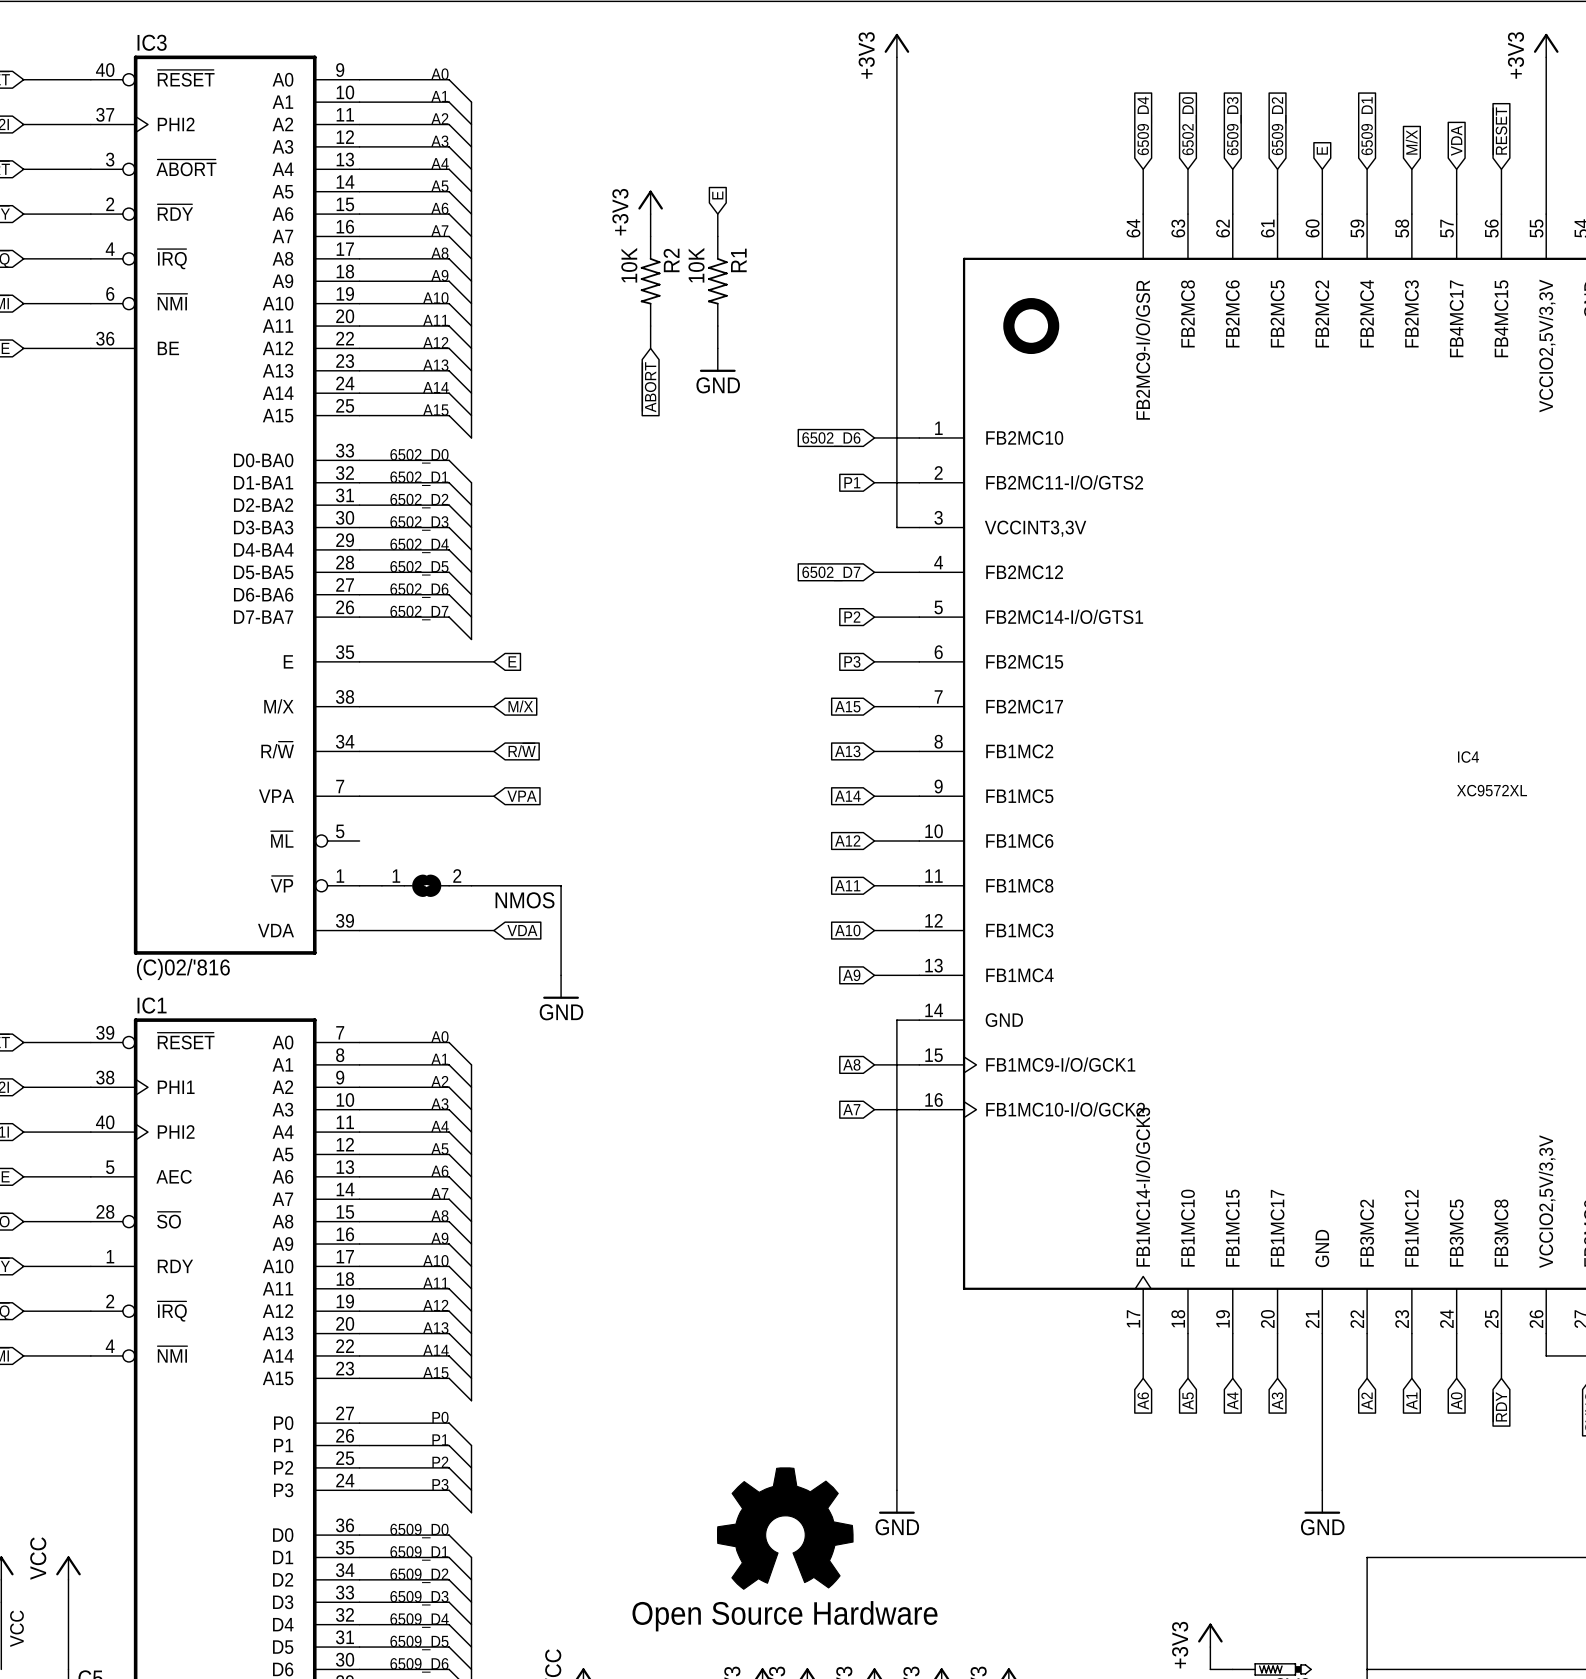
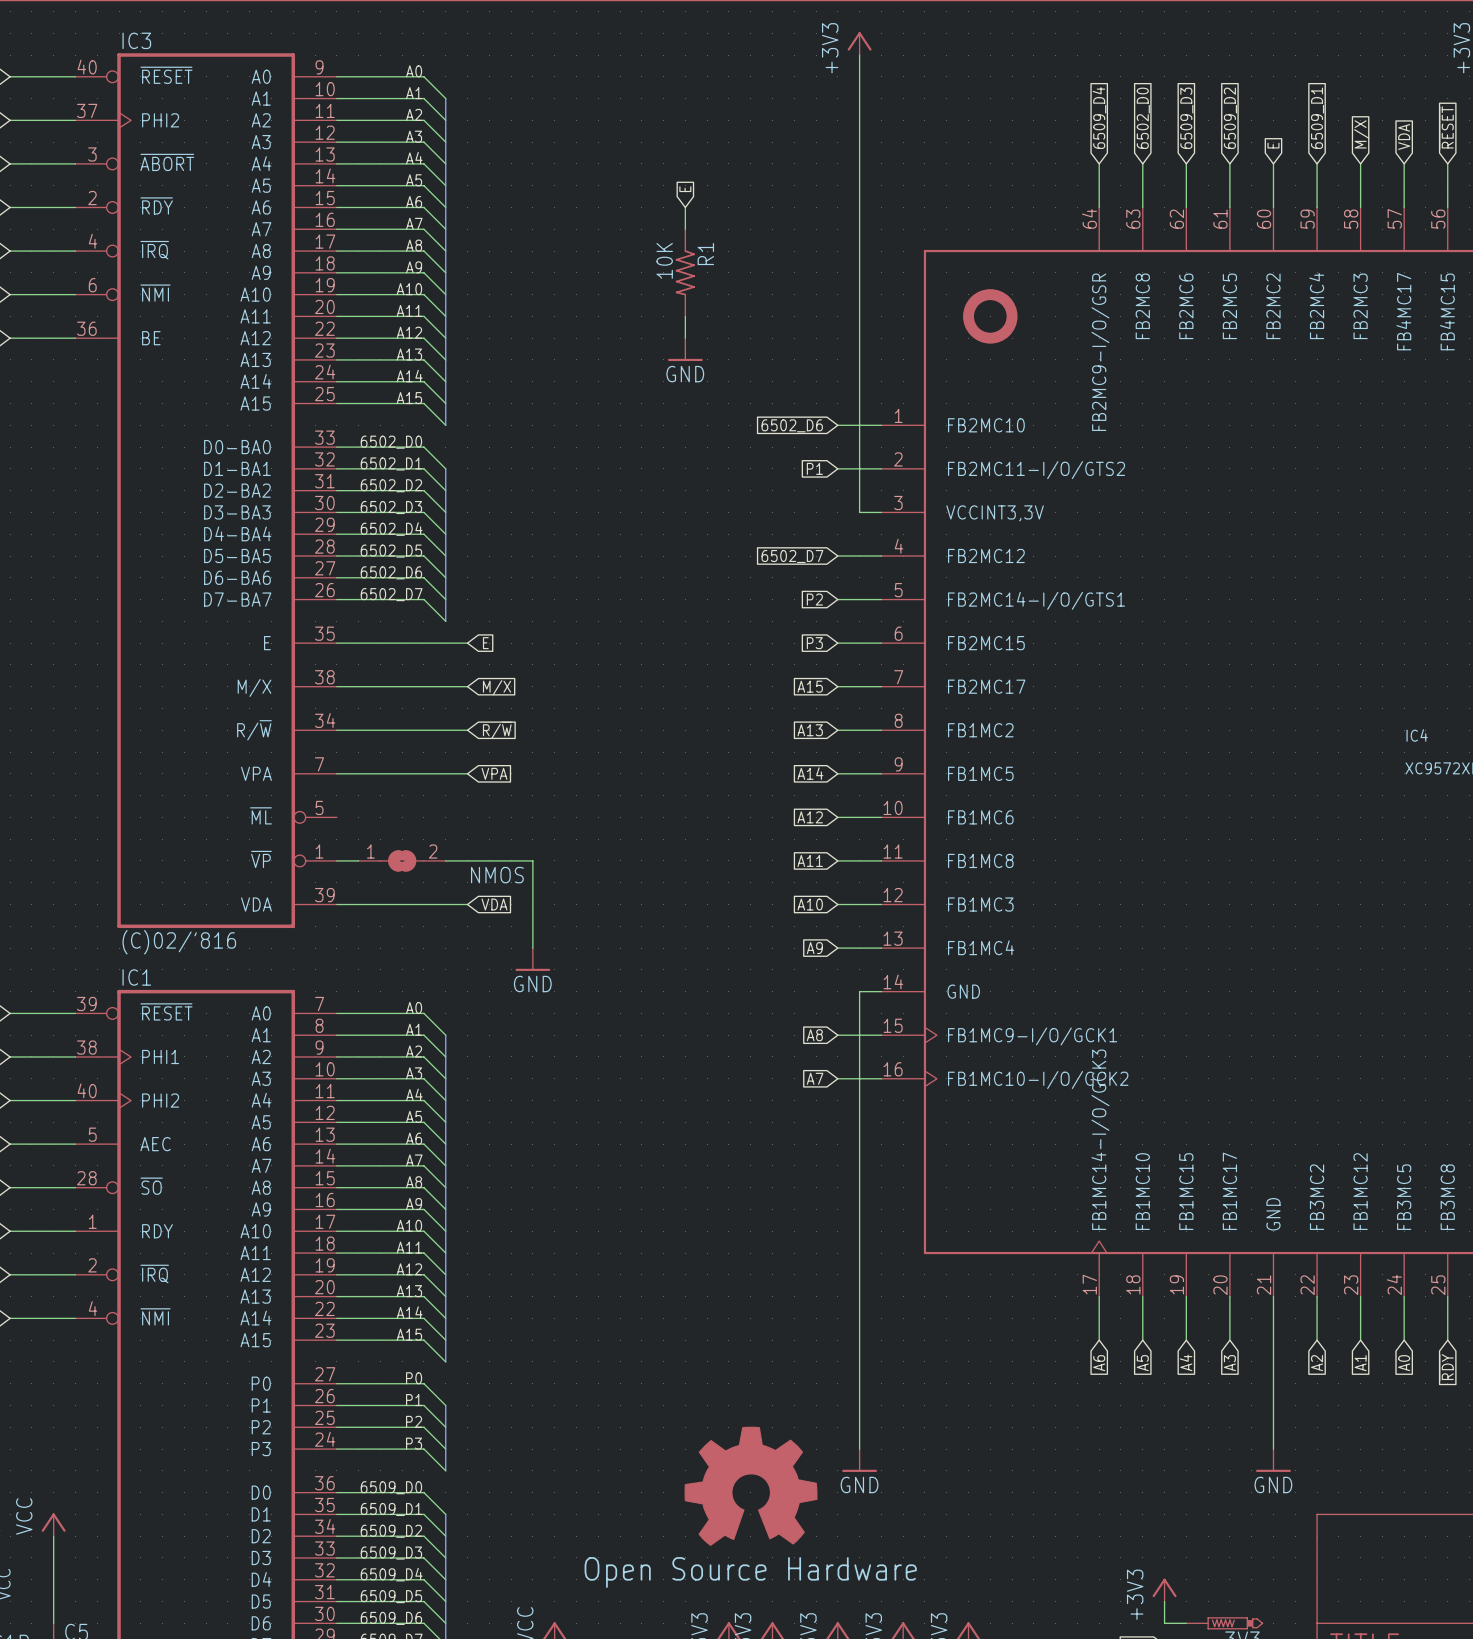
power symbol: +3V3 (650, 202) -> none
wire: (650, 214) (650, 236) -> none
R2: 10K (650, 281) -> none
wire: (650, 326) (650, 348) -> none
global label: ~{ABORT} (649, 387) -> none

